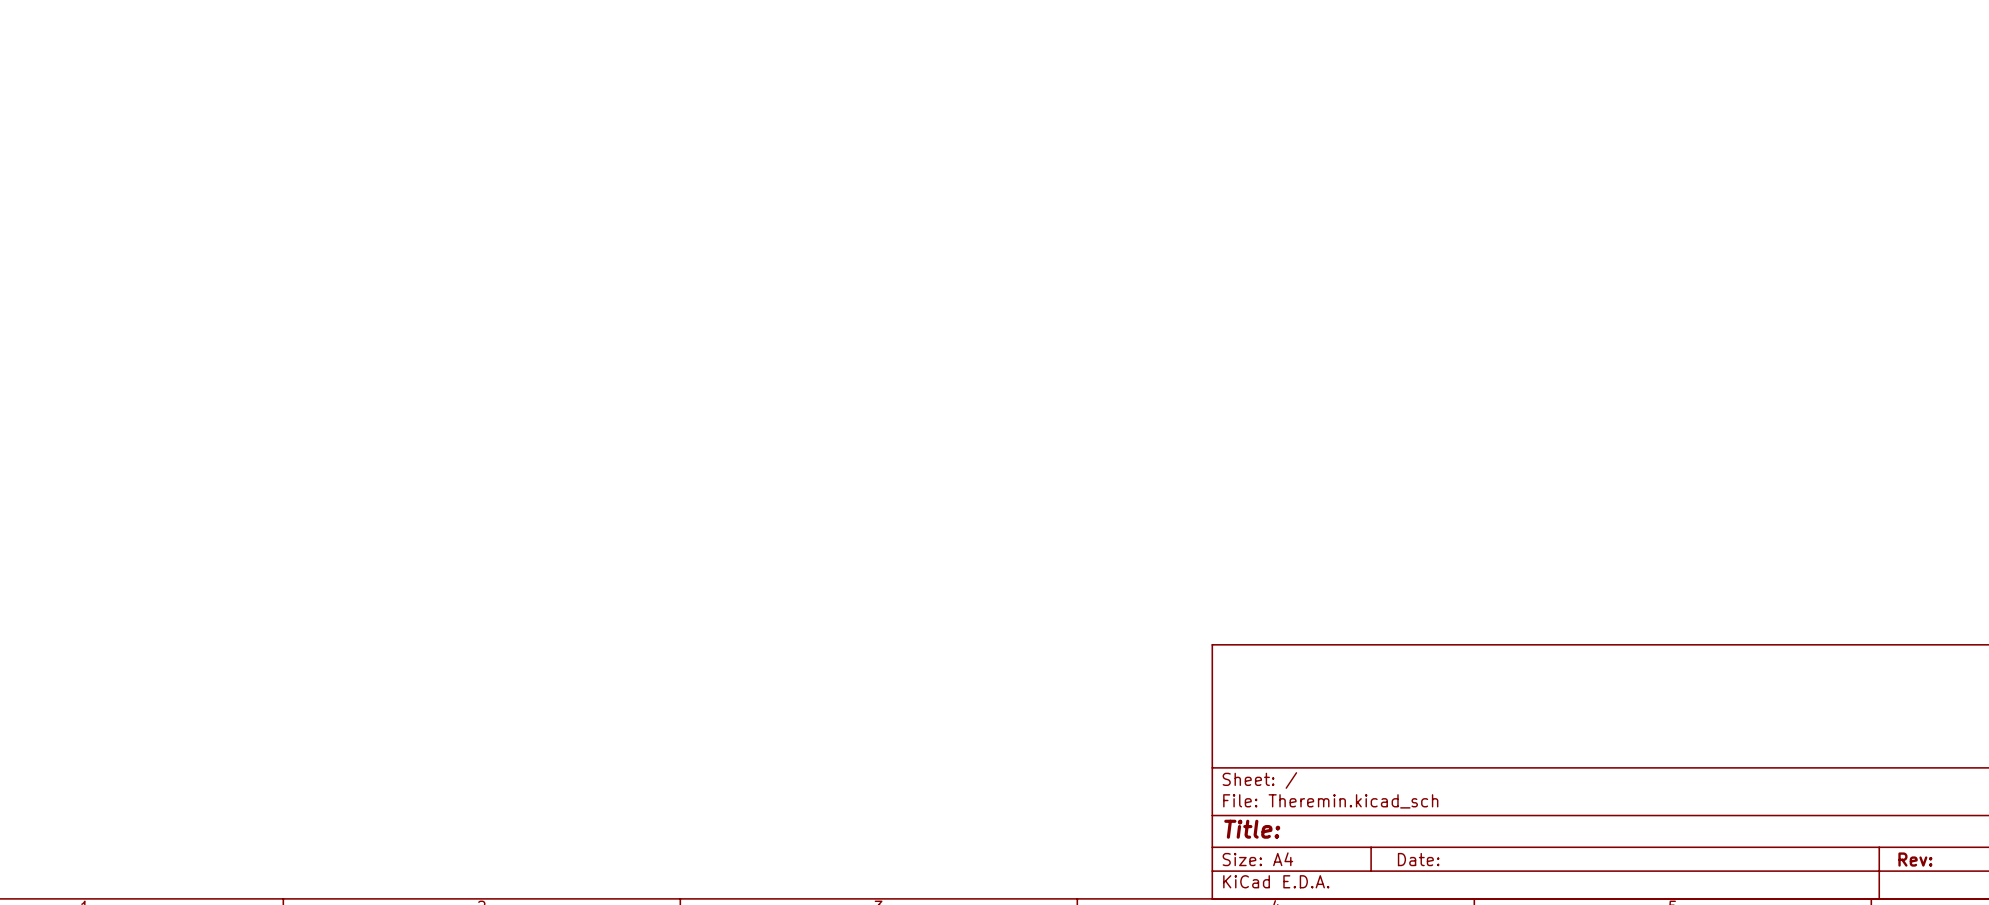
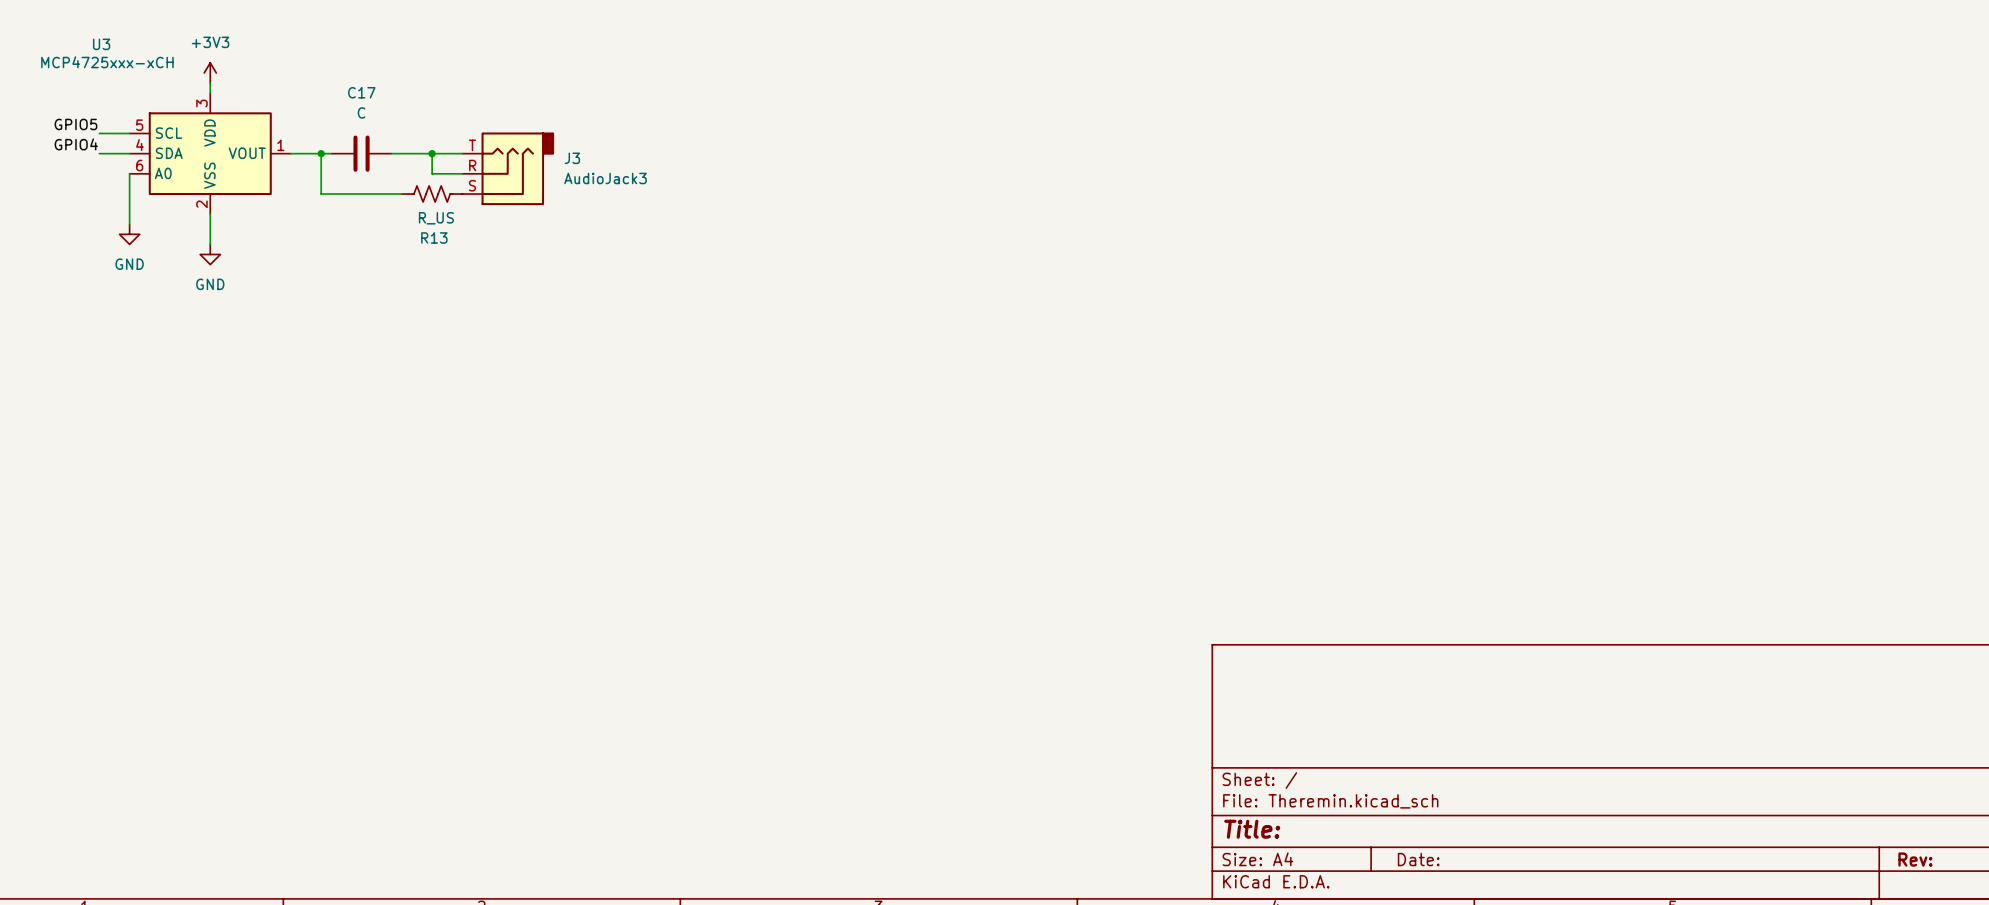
power symbol: none -> +3V3 (210, 72)
wire: none -> (210, 83) (210, 93)
label: none -> GPIO5 (75, 124)
wire: none -> (99, 133) (129, 133)
label: none -> GPIO4 (76, 144)
wire: none -> (99, 153) (129, 153)
U3: none -> MCP4725xxx-xCH (210, 153)
wire: none -> (290, 153) (331, 153)
wire: none -> (321, 153) (321, 193) (401, 193)
junction: none -> (321, 153)
C17: none -> C (361, 153)
wire: none -> (391, 153) (462, 153)
wire: none -> (432, 153) (432, 173) (462, 173)
junction: none -> (432, 153)
J3: none -> AudioJack3 (508, 168)
wire: none -> (129, 173) (129, 224)
R13: none -> R_US (432, 193)
wire: none -> (210, 214) (210, 244)
power symbol: none -> GND (129, 234)
power symbol: none -> GND (210, 254)

